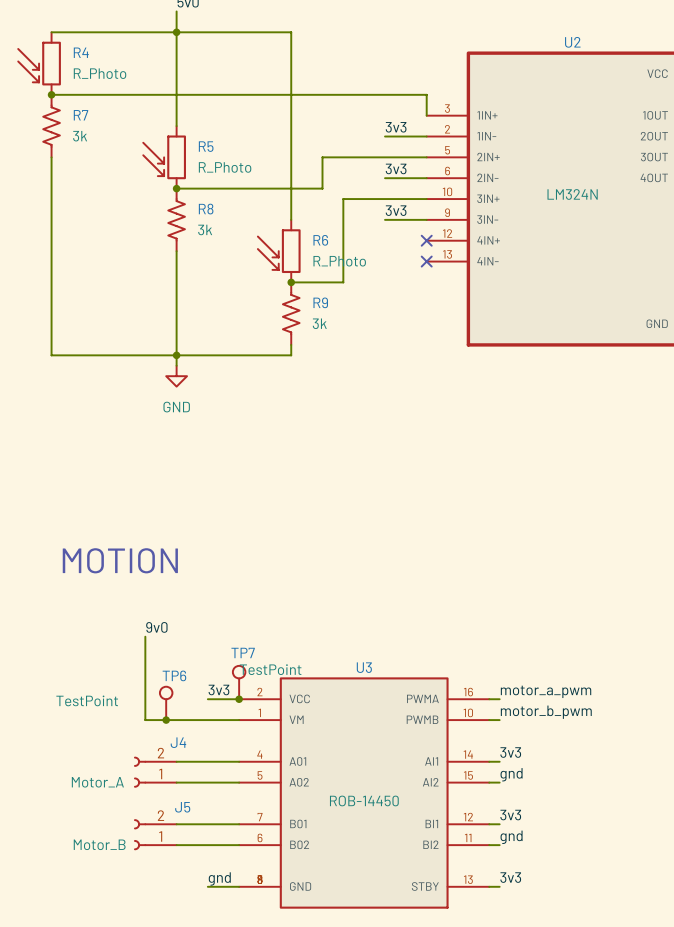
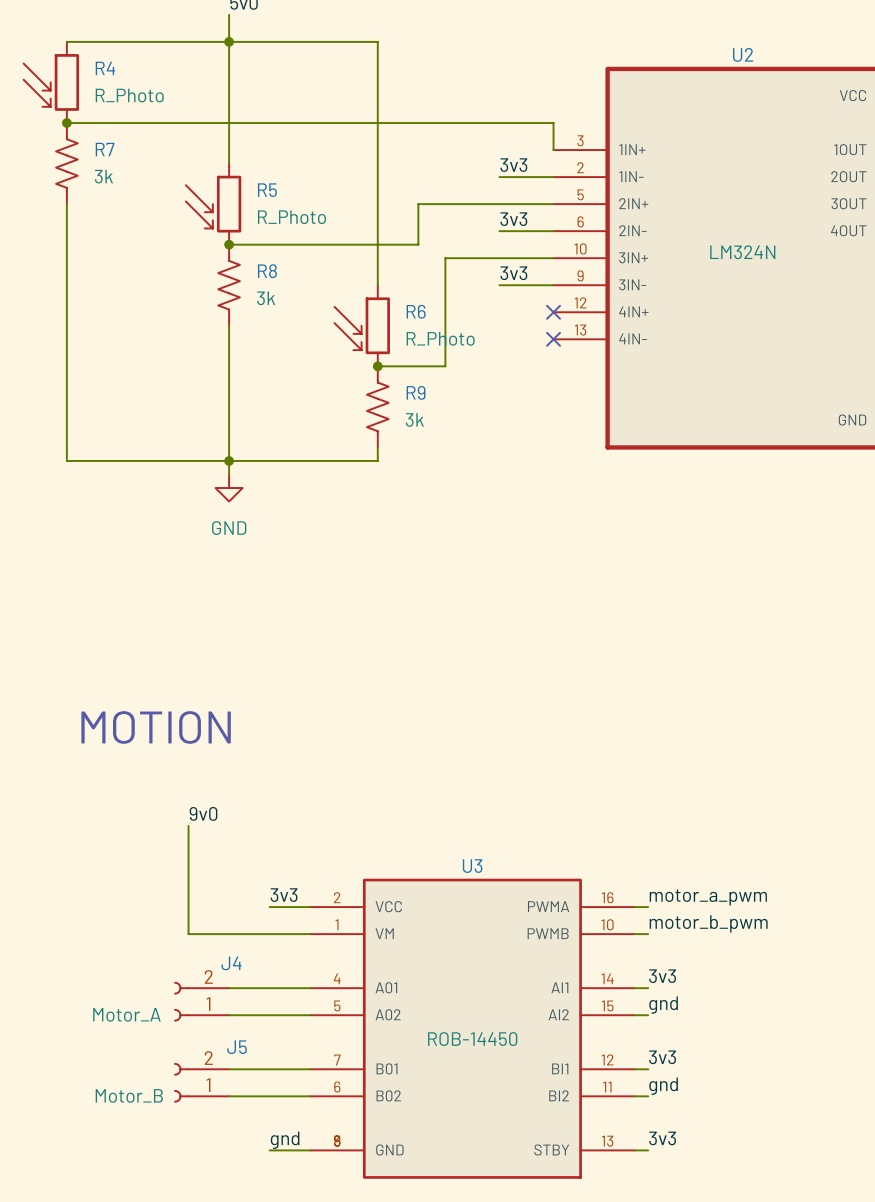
TP7: TestPoint (239, 682) -> none
junction: (239, 699) -> none
TP6: TestPoint (166, 703) -> none
junction: (166, 720) -> none

